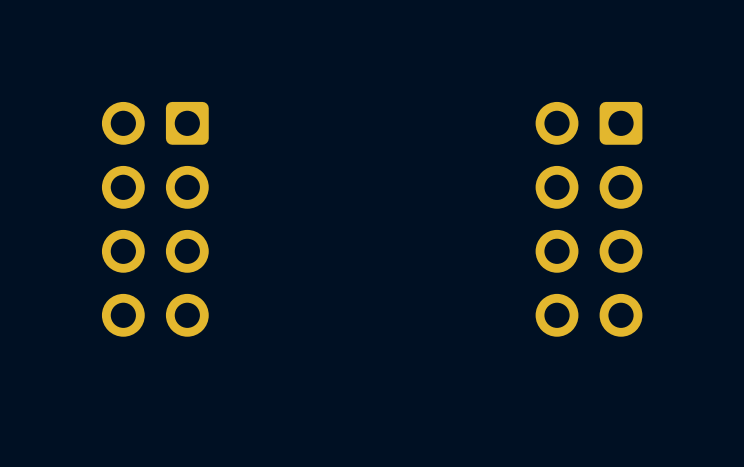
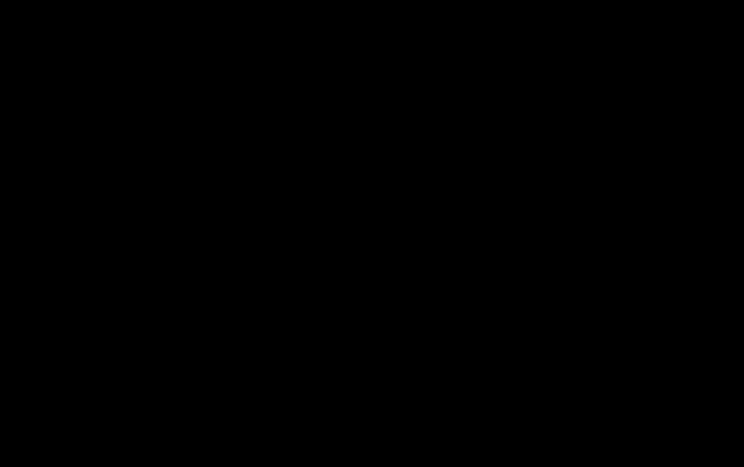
part: (155, 219) -> none
part: (589, 219) -> none

